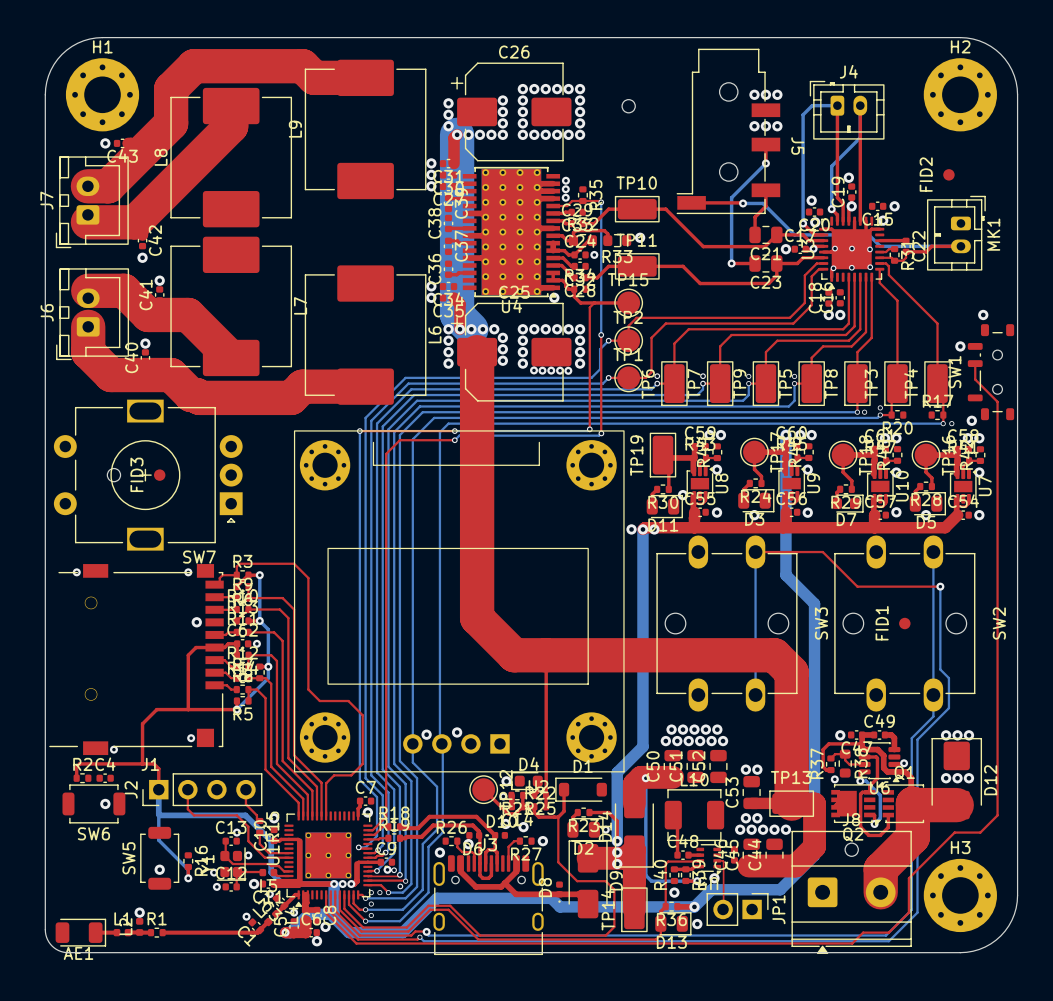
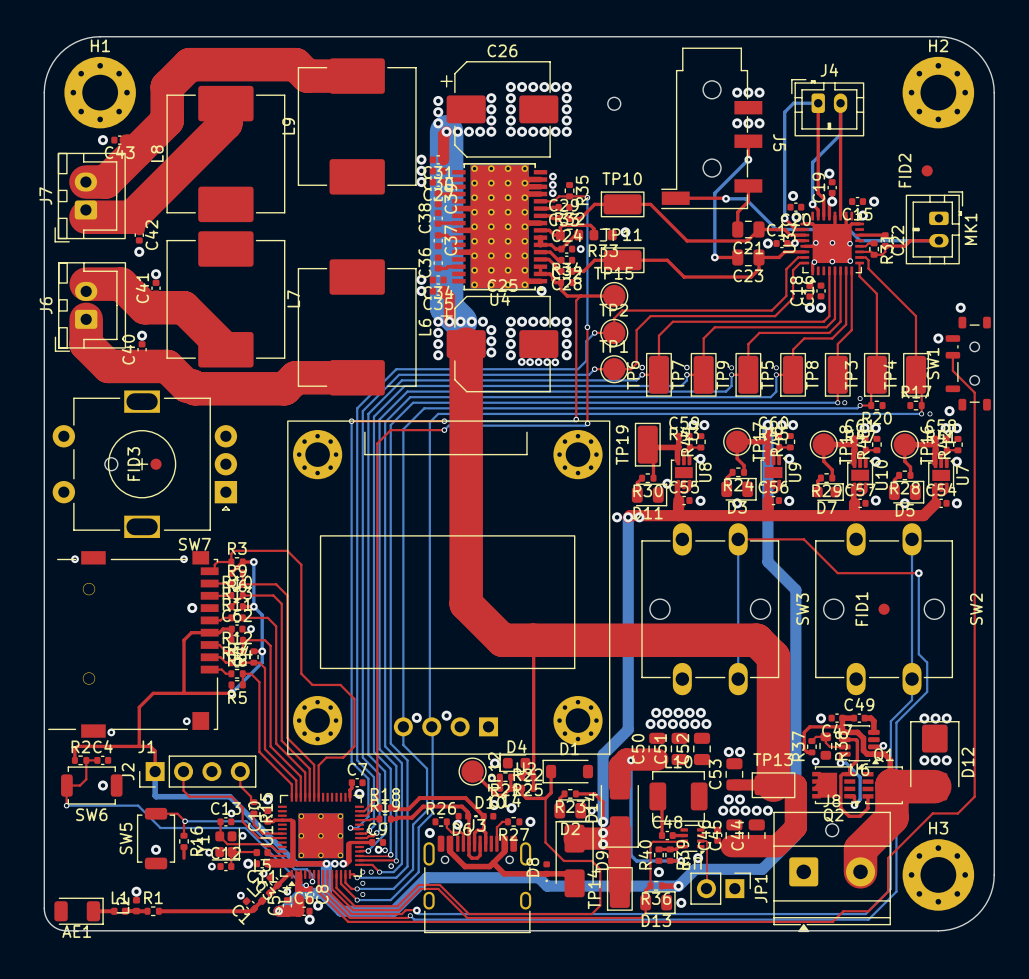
top track: none -> (97, 760) (86, 760) (86, 779) (80, 785) (66, 785) (66, 805)
bottom track: (158, 814) (158, 840) (188, 869) (188, 878) -> none
bottom track: (235, 815) (245, 815) (271, 841) (271, 872) (282, 884) (303, 884) -> (229, 796) (296, 863)
bottom track: none -> (66, 805) (138, 805) (160, 828) (245, 828) (302, 885) (306, 885)
via: none -> (66, 805)
top track: none -> (156, 813) (177, 813) (185, 821) (183, 835)
bottom track: none -> (185, 821) (246, 821) (294, 869) (306, 869) (312, 874) (312, 881)
via: none -> (185, 821)
via: (188, 878) -> none
via: none -> (312, 881)
via: none -> (306, 885)

